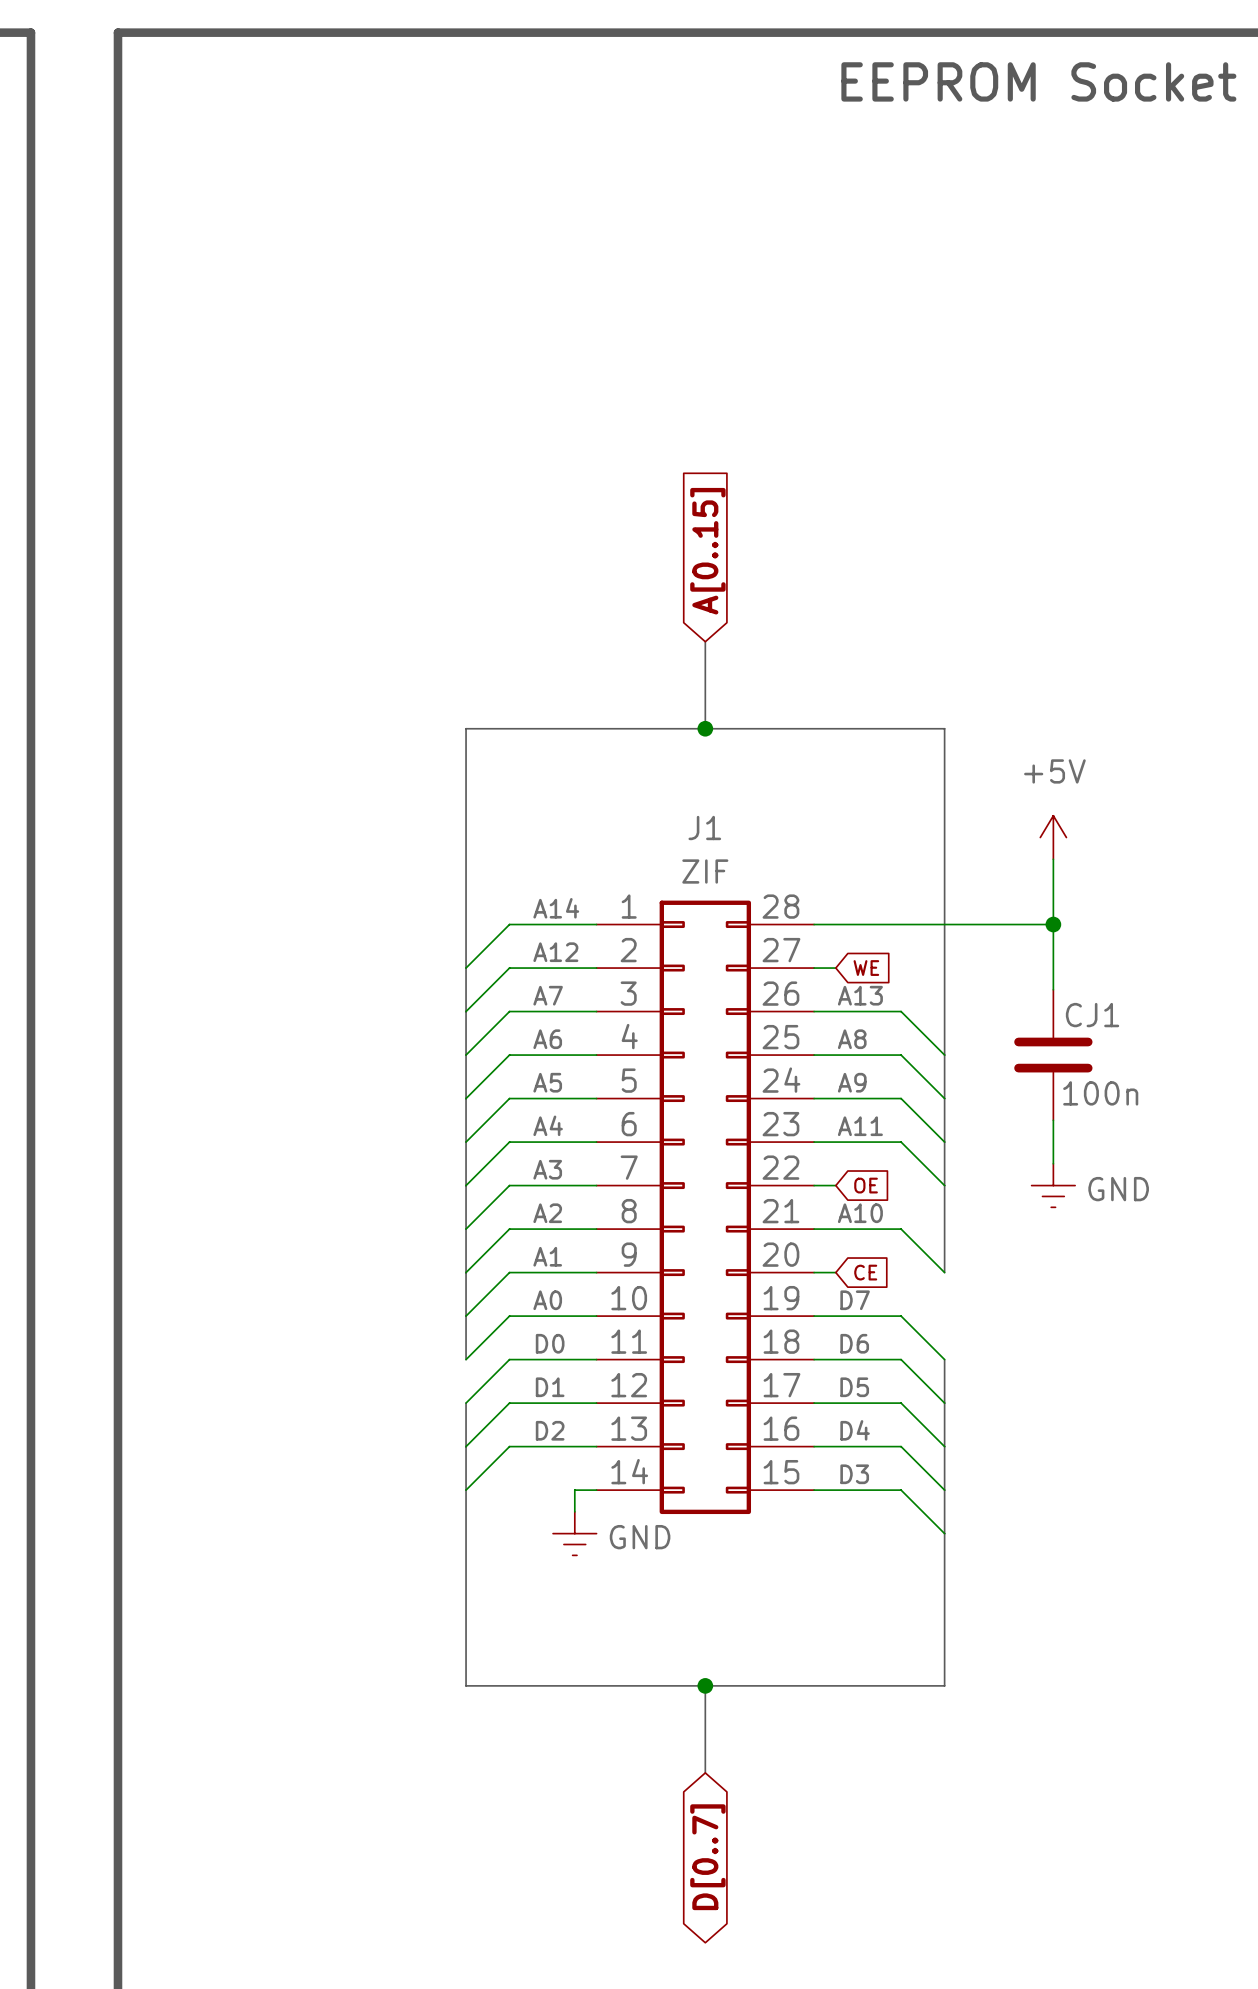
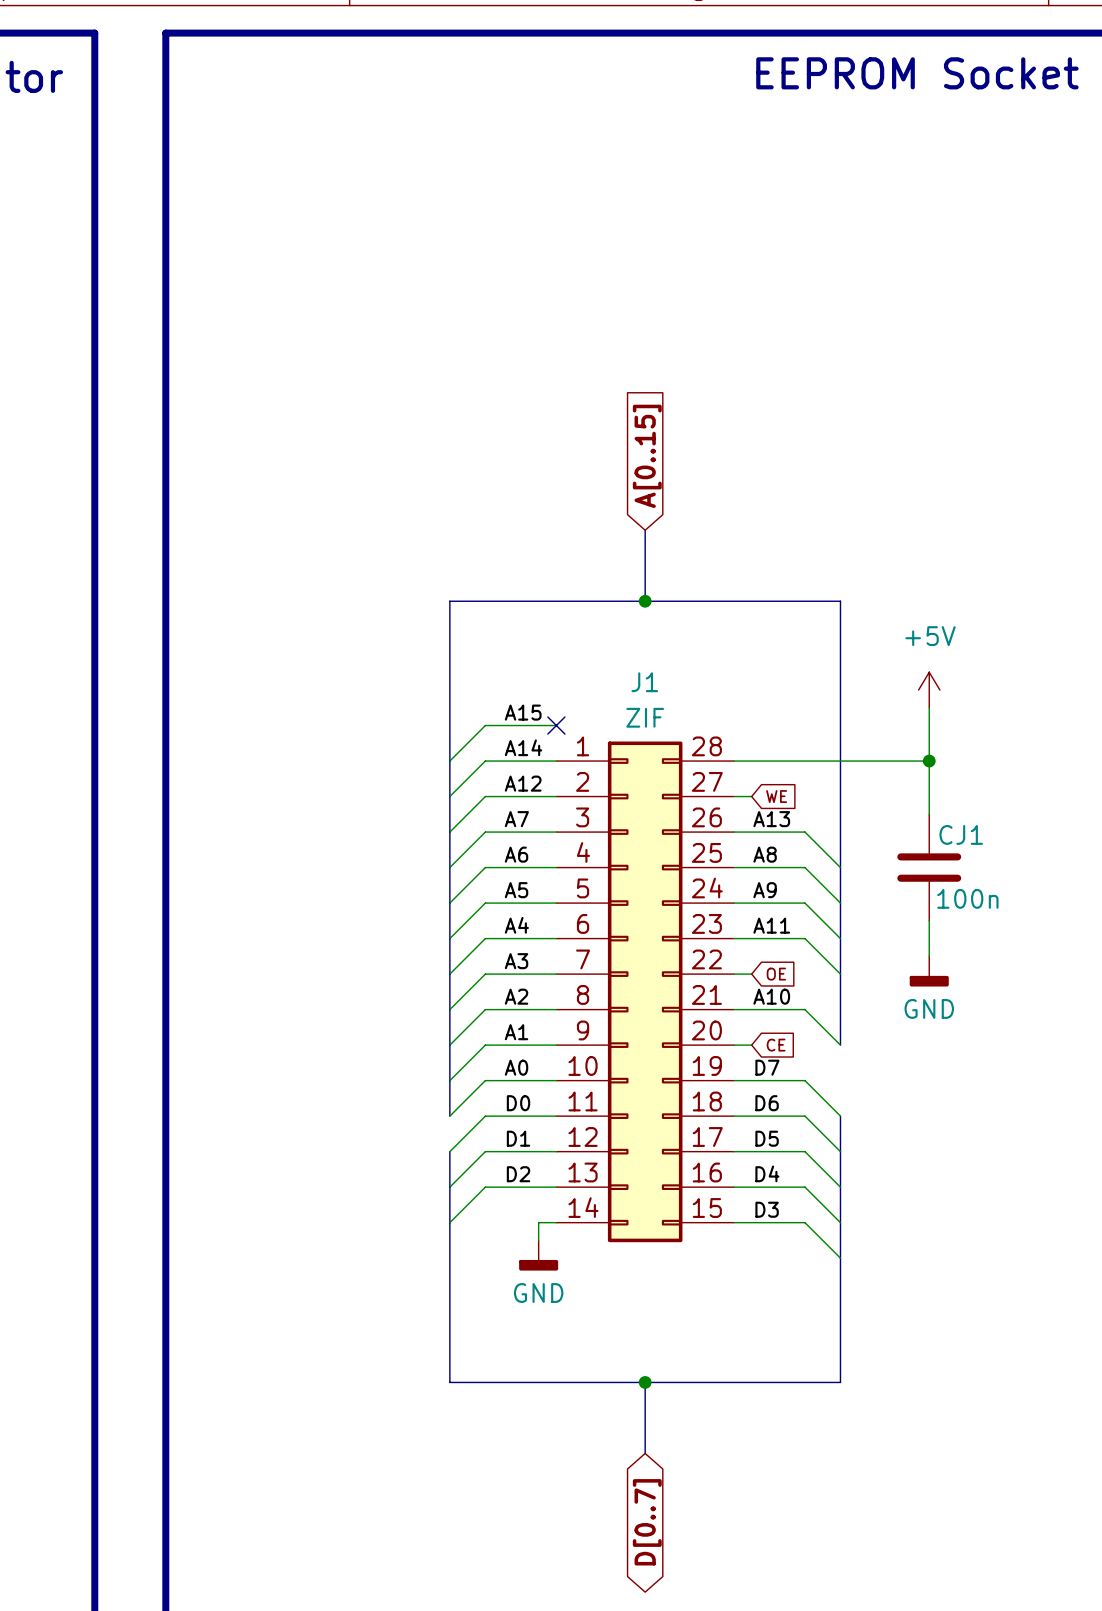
label: none -> A15 (523, 712)
wire: none -> (556, 725) (485, 725) (449, 761)
no-connect mark: none -> (556, 725)
power symbol shape: [1031, 1163, 1076, 1208] -> [909, 956, 949, 987]
power symbol text position: GND (1118, 1189) -> GND (929, 1008)
power symbol shape: [553, 1511, 597, 1556] -> [519, 1240, 559, 1271]
power symbol text position: GND (640, 1537) -> GND (538, 1293)

